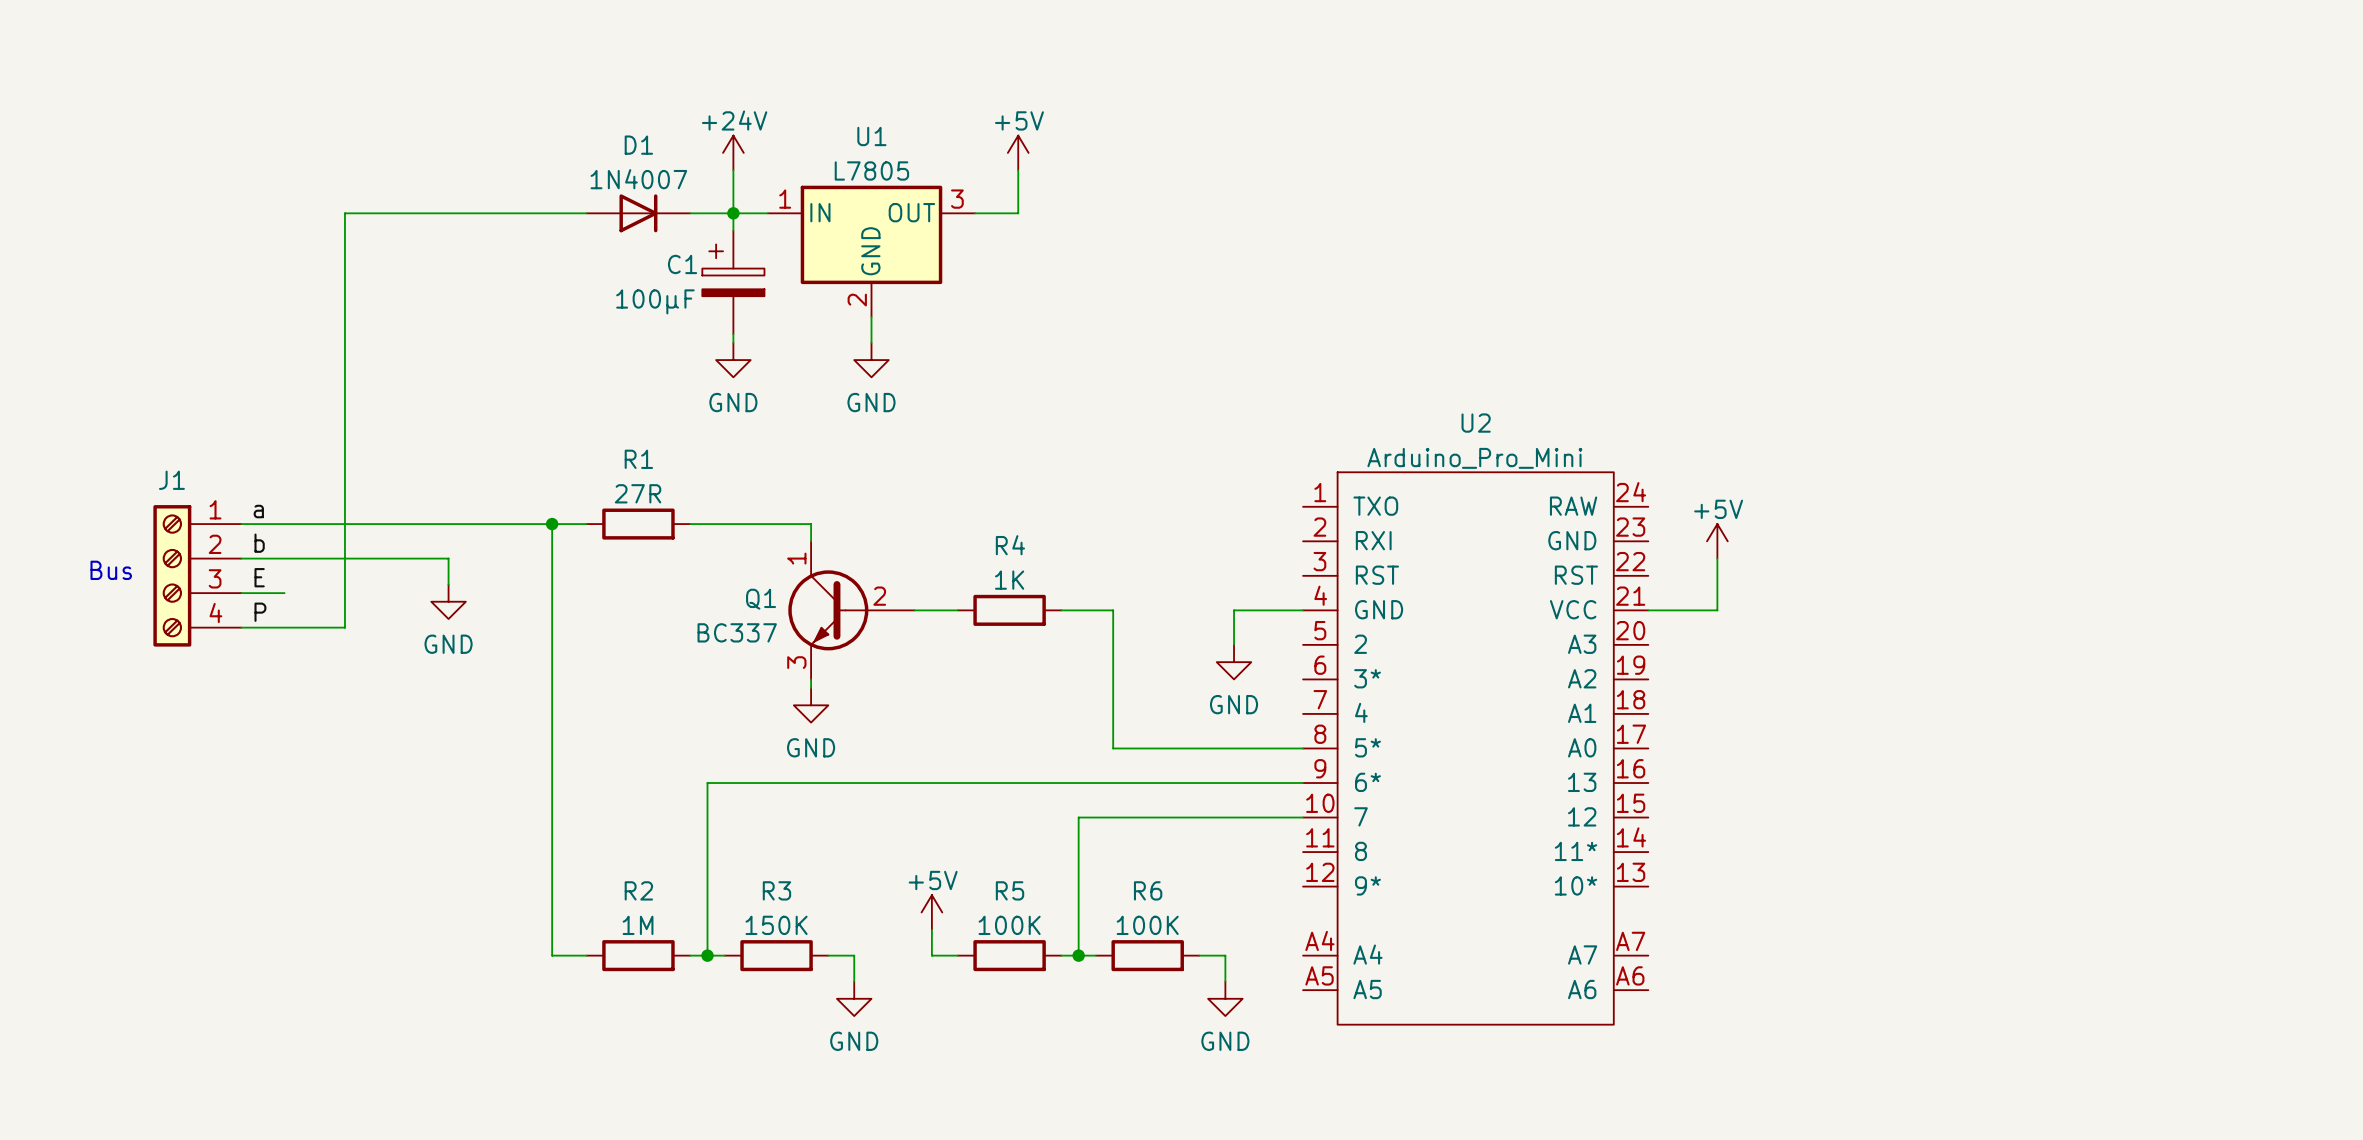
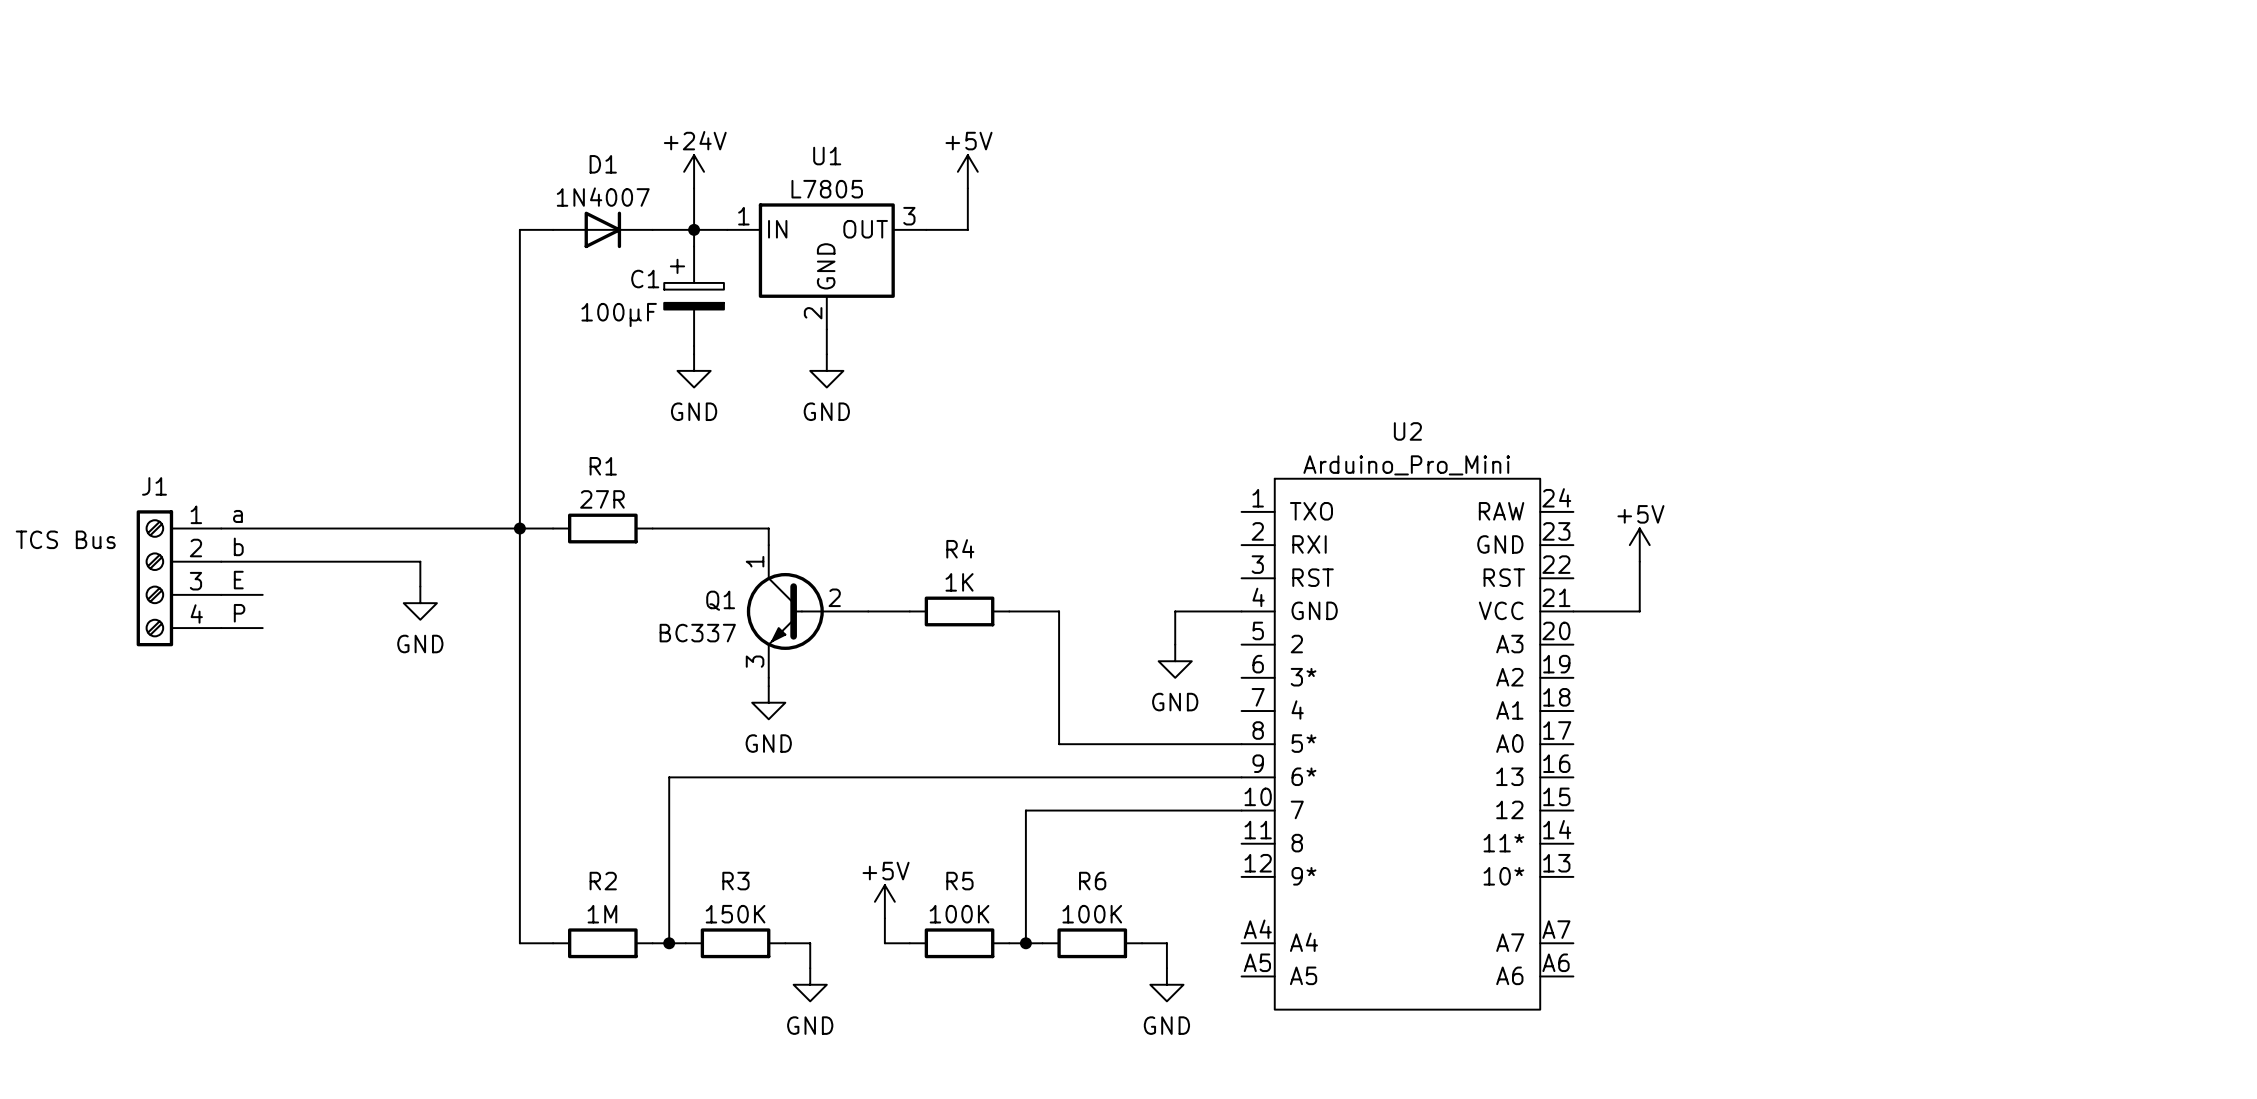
wire: (552, 213) (344, 213) (344, 627) (284, 627) -> (519, 229) (519, 528)
text: none -> TCS Bus (65, 539)
text: Bus (111, 570) -> none

